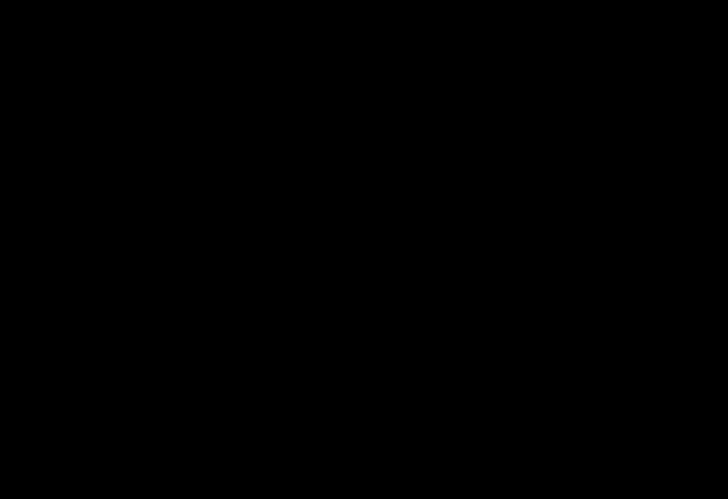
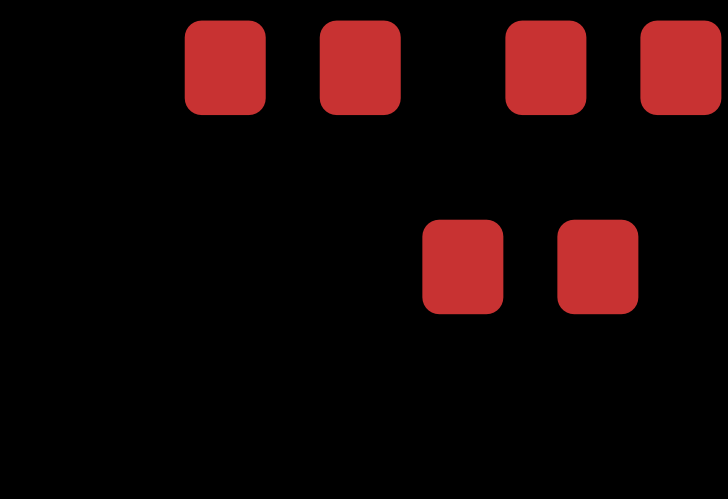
part: none -> (292, 67)
part: none -> (613, 67)
part: none -> (530, 266)

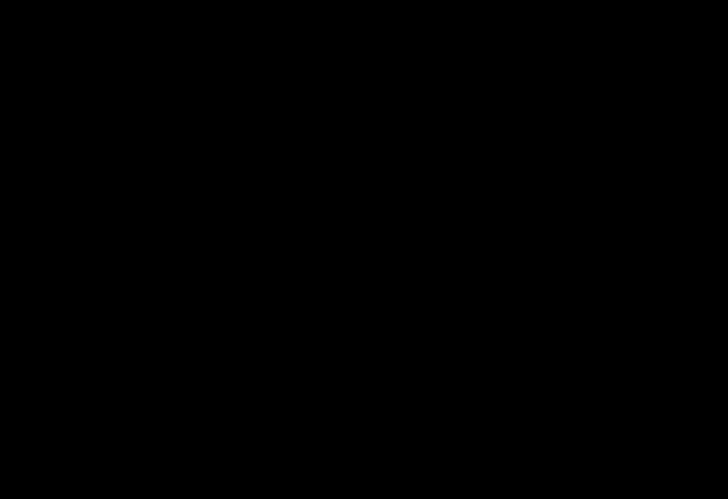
part: (292, 67) -> none
part: (613, 67) -> none
part: (530, 266) -> none

